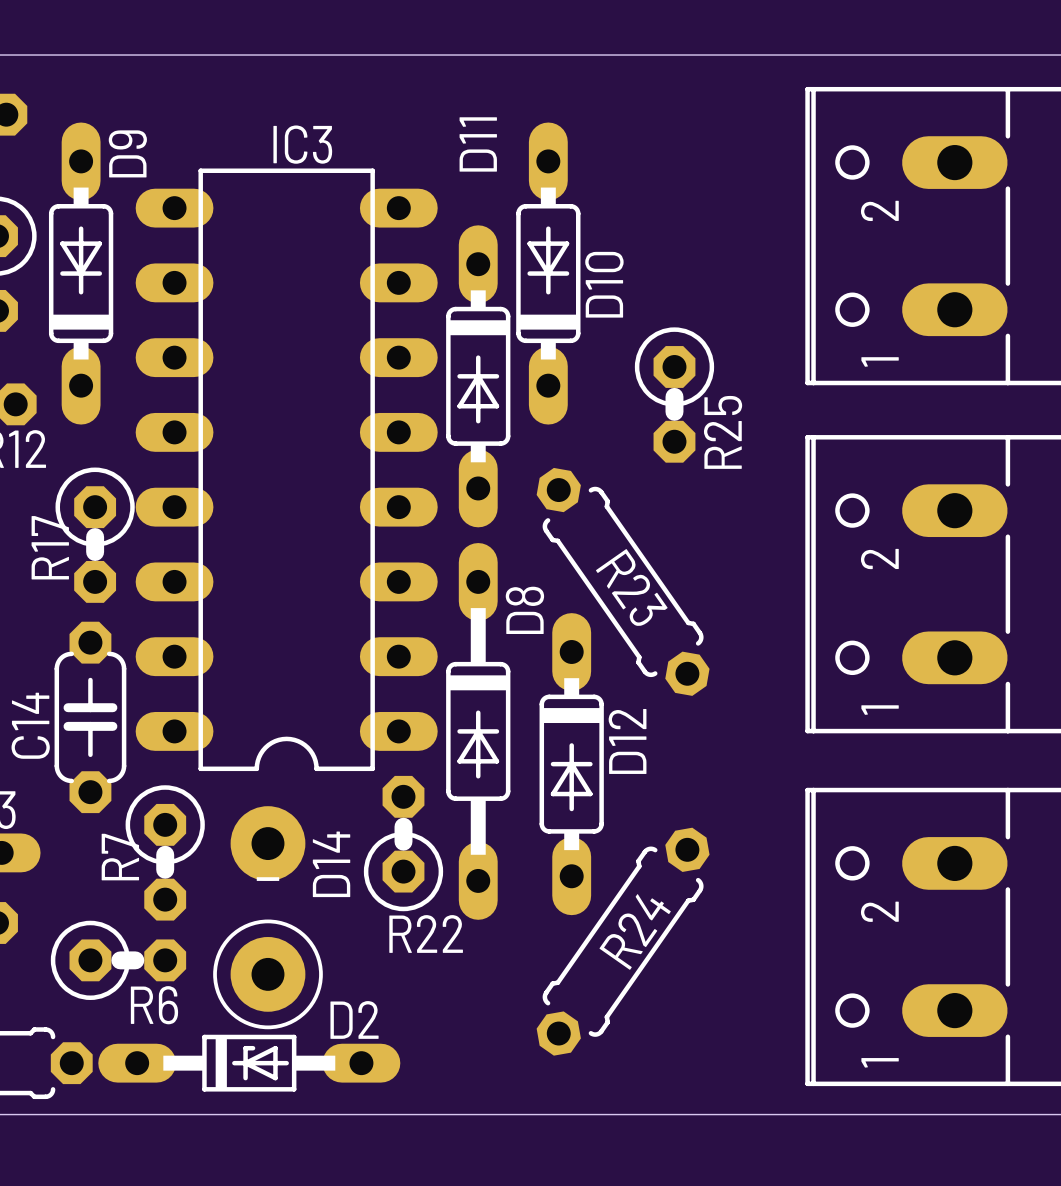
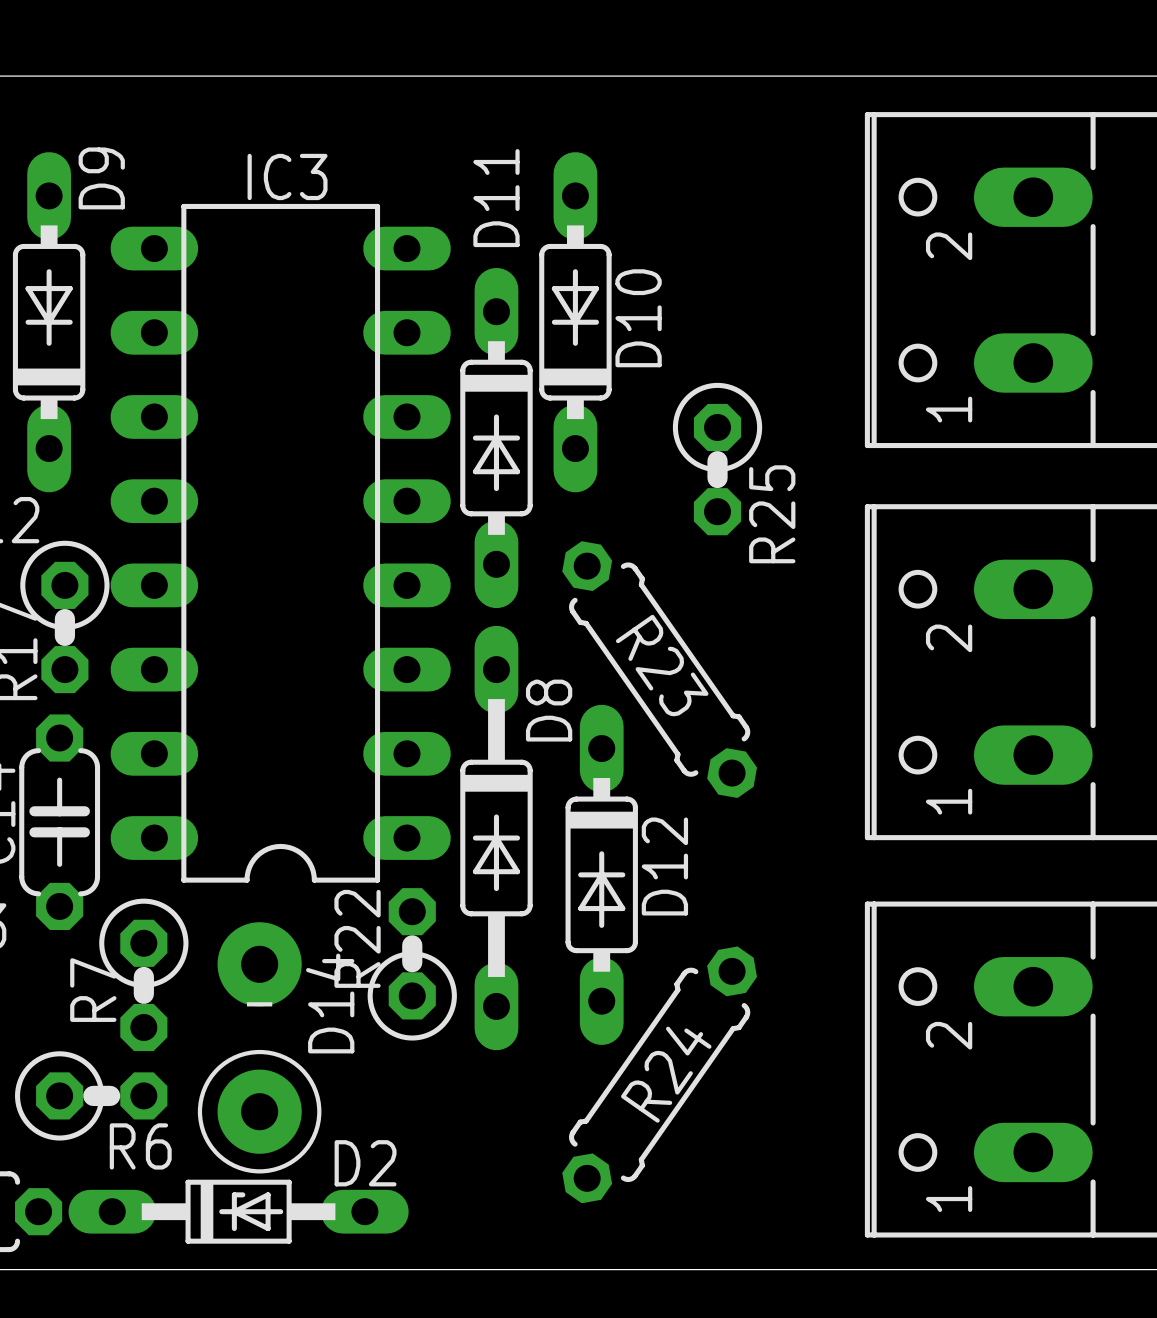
R22 name rotation: 0° (426, 933) -> 90° counterclockwise (357, 938)
R22 name position: R22 (426, 933) -> R22 (357, 938)

